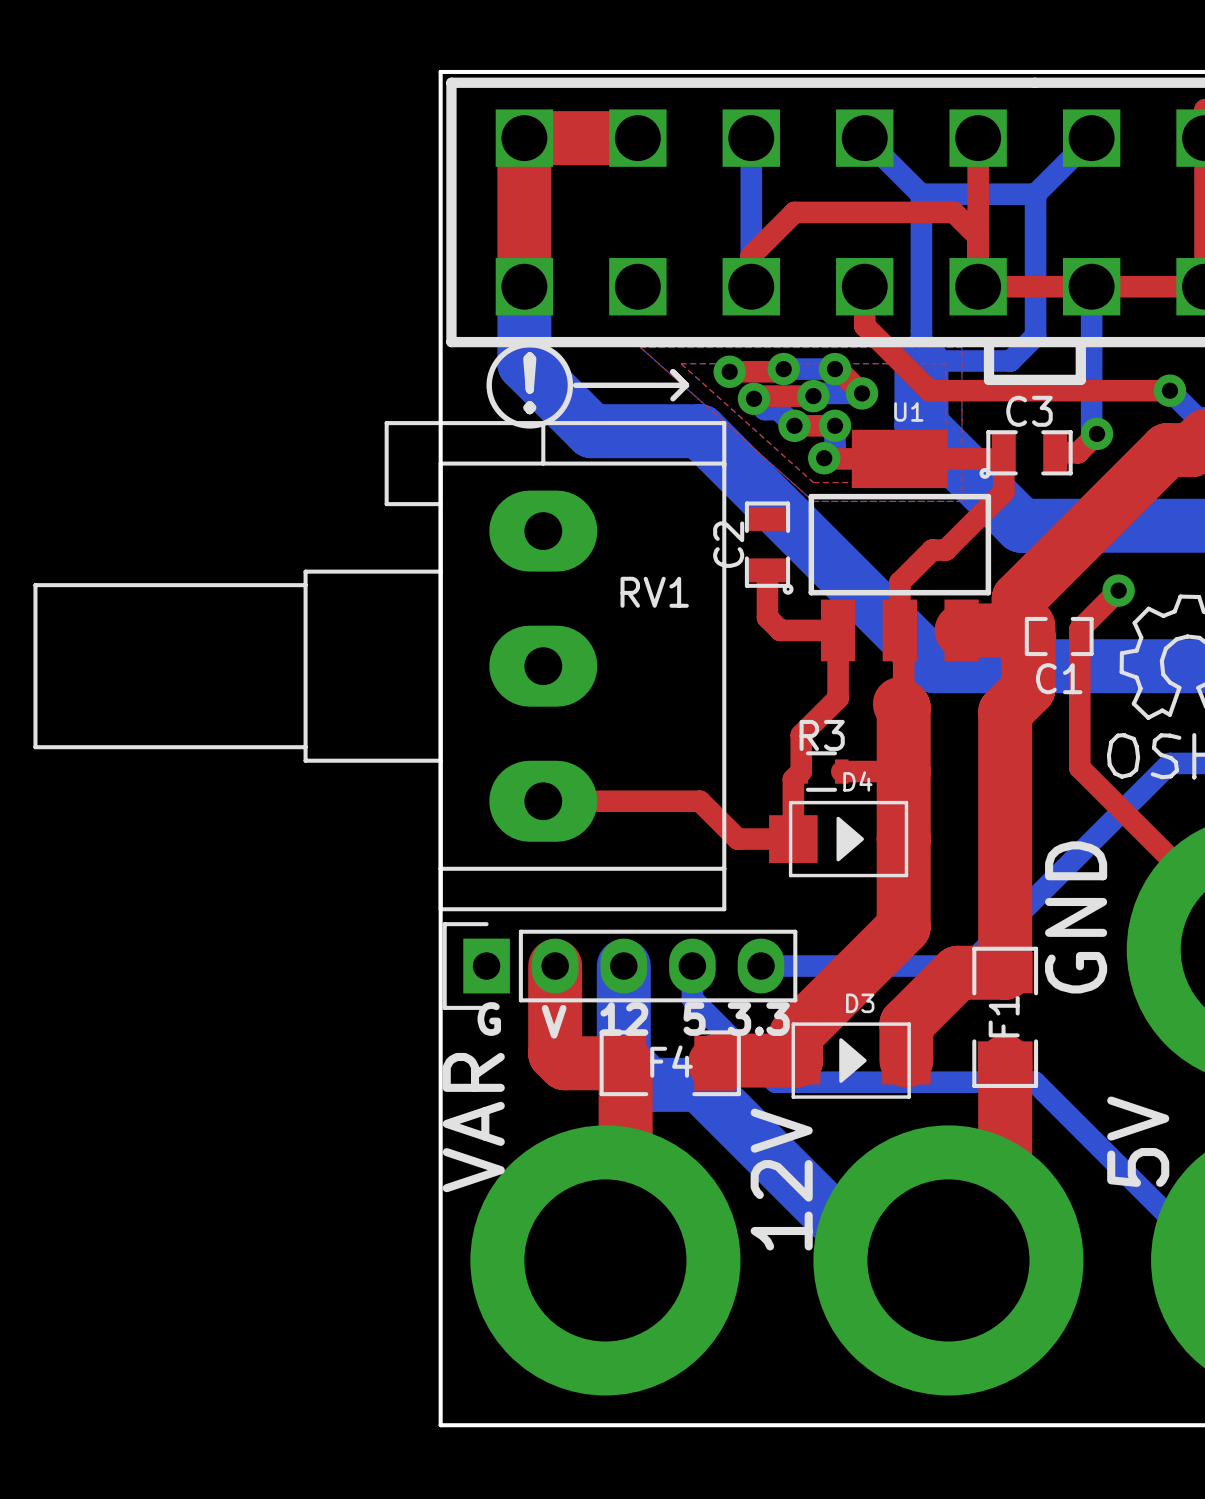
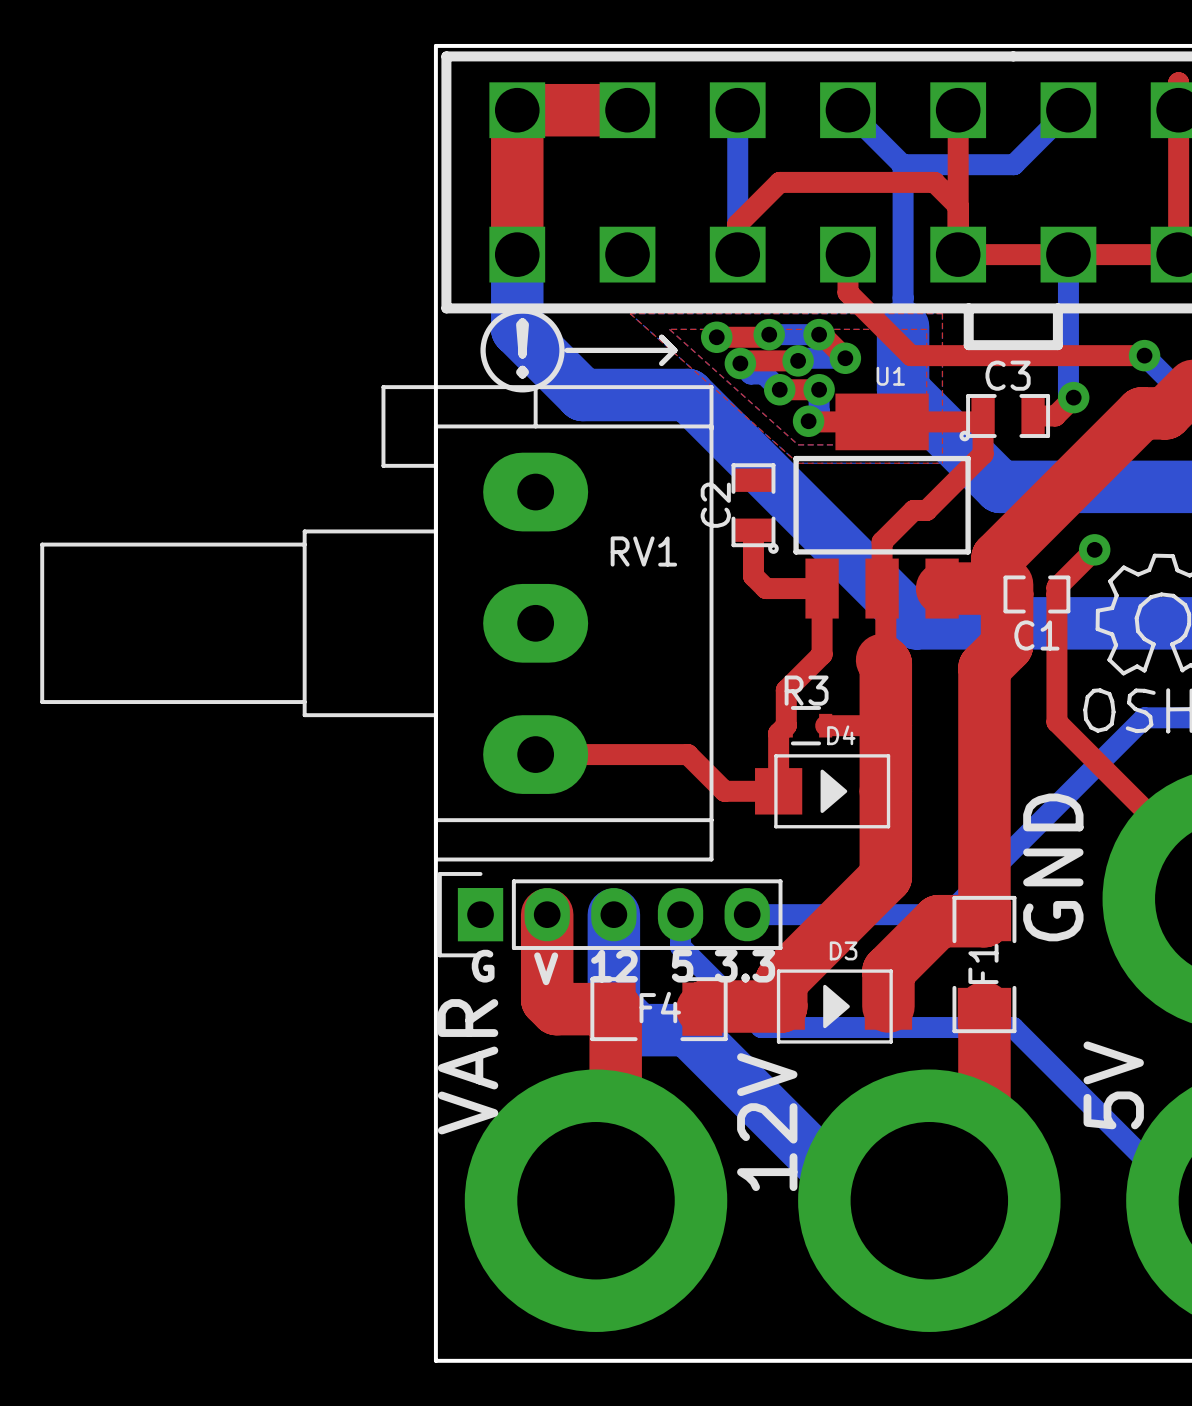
bottom track: (1035, 194) (1035, 336) (1010, 360) (921, 360) -> none

